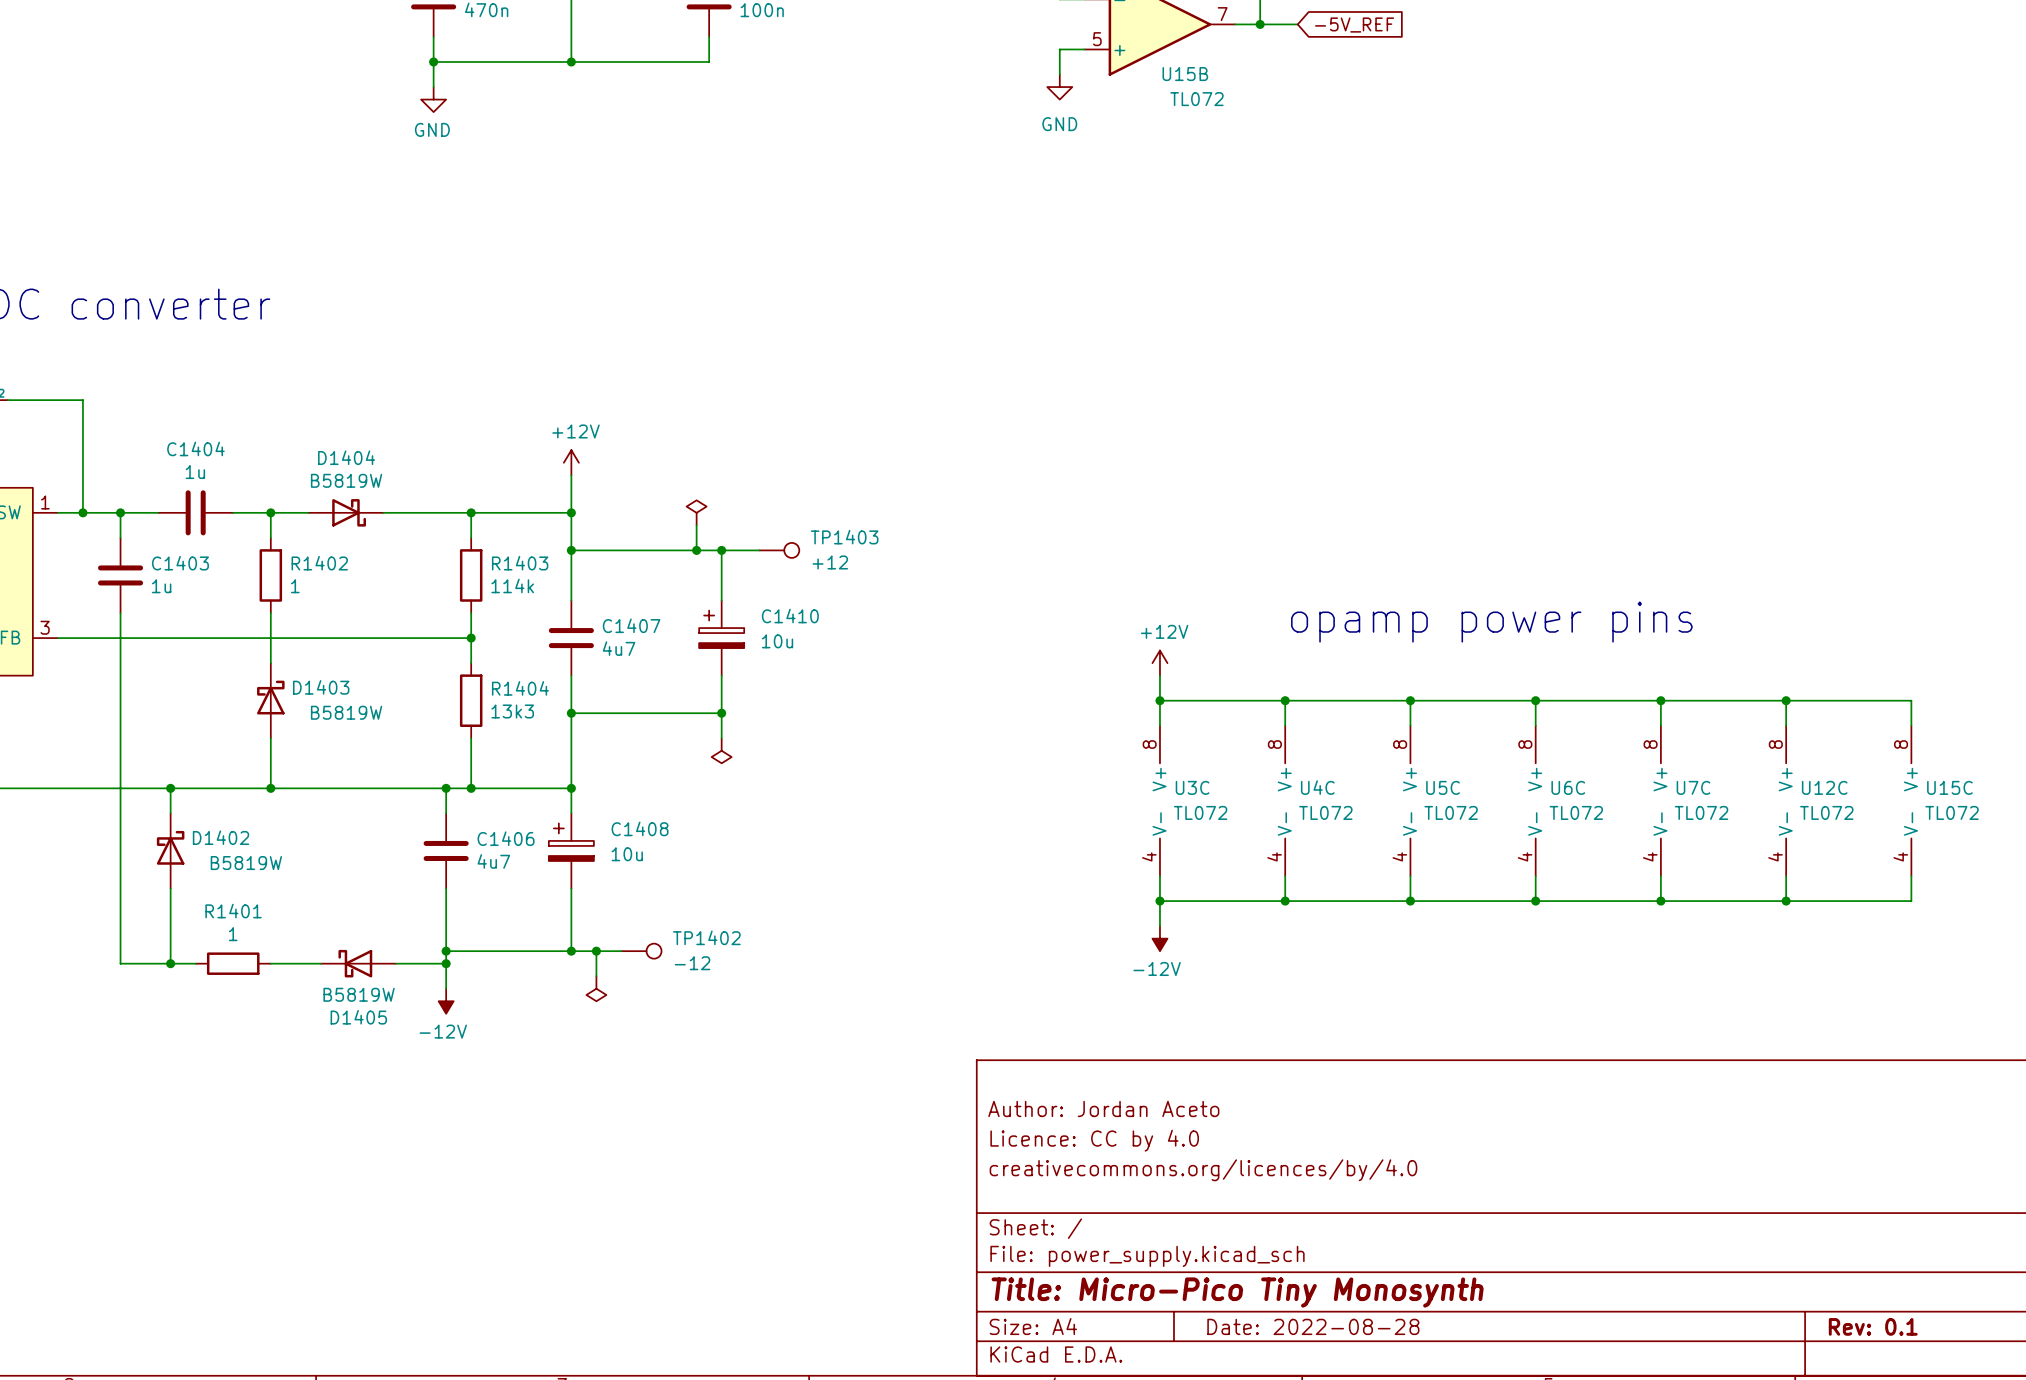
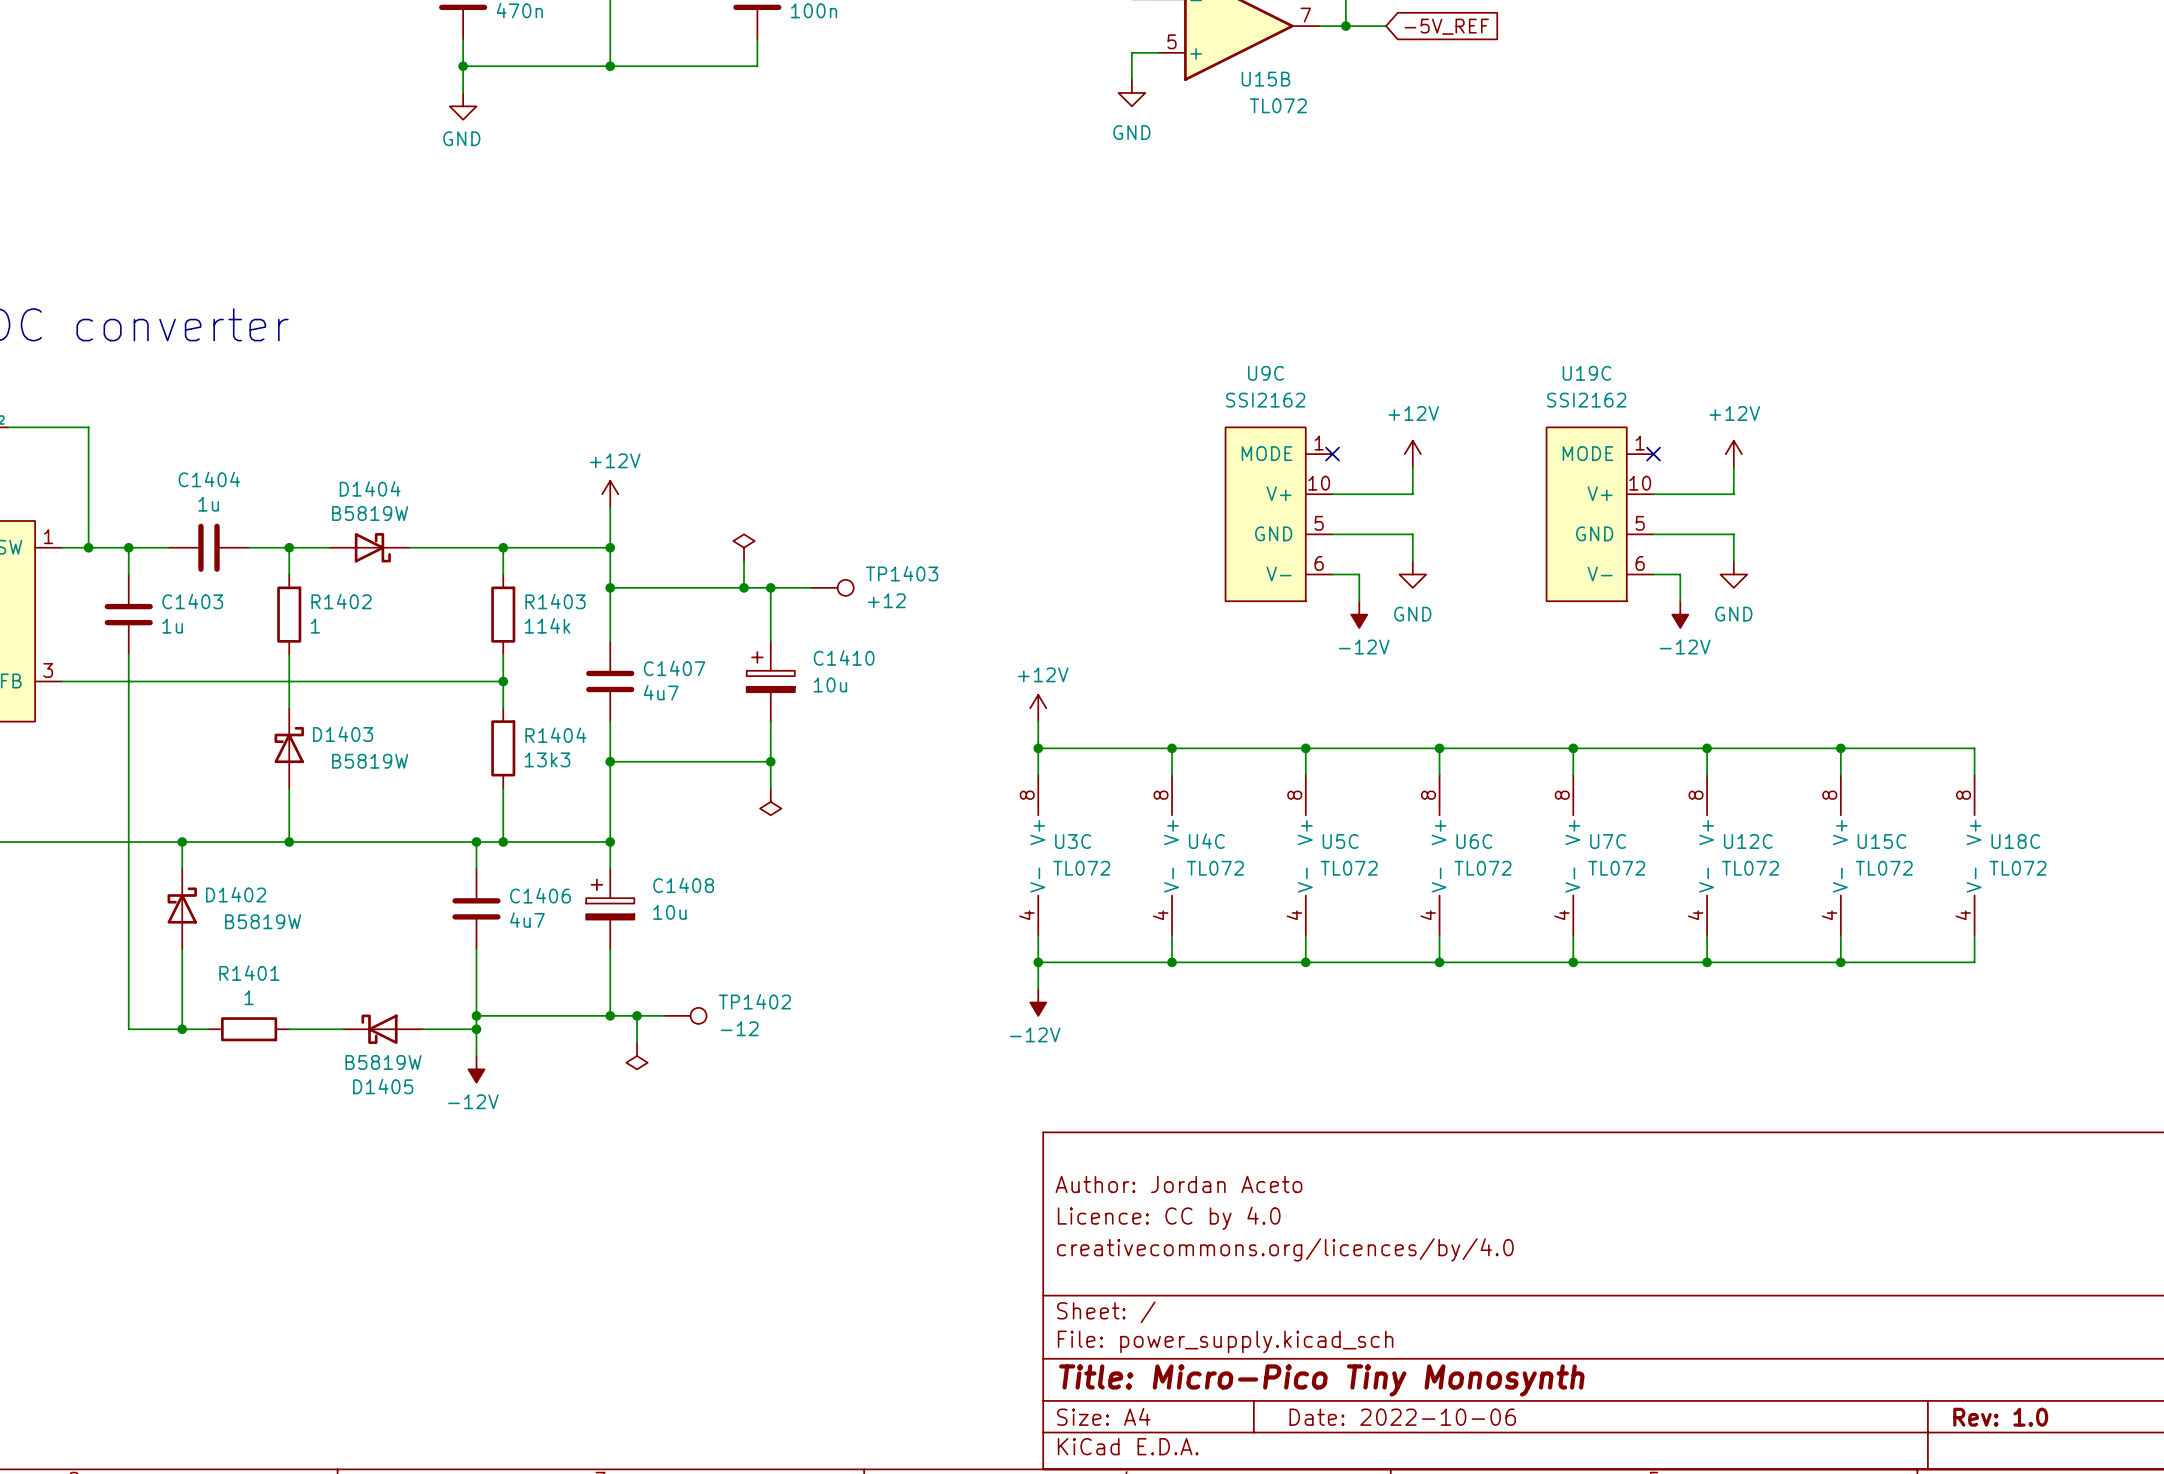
no-connect mark: none -> (1332, 454)
power symbol: none -> +12V (1412, 454)
no-connect mark: none -> (1653, 454)
power symbol: none -> +12V (1733, 454)
wire: none -> (1412, 467) (1412, 494) (1332, 494)
wire: none -> (1733, 467) (1733, 494) (1653, 494)
U9C: none -> SSI2162 (1279, 514)
U19C: none -> SSI2162 (1600, 514)
wire: none -> (1332, 534) (1412, 534) (1412, 561)
wire: none -> (1653, 534) (1733, 534) (1733, 561)
wire: none -> (1332, 574) (1359, 574) (1359, 601)
power symbol: none -> GND (1412, 574)
wire: none -> (1653, 574) (1680, 574) (1680, 601)
power symbol: none -> GND (1733, 574)
power symbol: none -> -12V (1359, 614)
power symbol: none -> -12V (1680, 614)
text: opamp power pins (1491, 622) -> none
power symbol: none -> +12V (1038, 708)
power symbol: +12V (1159, 663) -> none
wire: (1159, 675) (1159, 725) -> (1038, 721) (1038, 775)
wire: none -> (1038, 748) (1238, 748)
junction: none -> (1038, 748)
junction: none -> (1172, 748)
junction: (1159, 700) -> none
junction: none -> (1305, 748)
wire: (1285, 700) (1285, 725) -> (1172, 748) (1172, 775)
junction: (1285, 700) -> none
junction: none -> (1439, 748)
wire: (1410, 700) (1410, 725) -> (1305, 748) (1305, 775)
junction: (1410, 700) -> none
junction: none -> (1573, 748)
wire: (1535, 700) (1535, 725) -> (1439, 748) (1439, 775)
junction: (1535, 700) -> none
junction: none -> (1707, 748)
wire: (1660, 700) (1660, 725) -> (1573, 748) (1573, 775)
junction: (1660, 700) -> none
wire: none -> (1840, 748) (1840, 775)
junction: none -> (1840, 748)
wire: (1786, 700) (1786, 725) -> (1707, 748) (1707, 775)
junction: (1786, 700) -> none
wire: (1848, 700) (1911, 700) (1911, 725) -> (1974, 748) (1974, 775)
U3C position: (1159, 800) -> (1038, 855)
U4C position: (1285, 800) -> (1172, 855)
U5C position: (1410, 800) -> (1305, 855)
U6C position: (1535, 800) -> (1439, 855)
U7C position: (1660, 800) -> (1573, 855)
U12C position: (1786, 800) -> (1707, 855)
U18C: none -> TL072 (1974, 855)
U15C position: (1911, 800) -> (1840, 855)
wire: (1159, 876) (1159, 926) -> (1038, 935) (1038, 989)
wire: (1285, 876) (1285, 901) -> (1172, 935) (1172, 962)
wire: (1410, 876) (1410, 901) -> (1305, 935) (1305, 962)
wire: (1535, 876) (1535, 901) -> (1439, 935) (1439, 962)
wire: (1660, 876) (1660, 901) -> (1573, 935) (1573, 962)
wire: none -> (1840, 935) (1840, 962)
wire: (1786, 876) (1786, 901) -> (1707, 935) (1707, 962)
wire: (1911, 876) (1911, 901) (1848, 901) -> (1974, 935) (1974, 962)
wire: none -> (1038, 962) (1238, 962)
junction: none -> (1038, 962)
junction: none -> (1172, 962)
junction: (1159, 901) -> none
junction: none -> (1305, 962)
junction: (1285, 901) -> none
junction: none -> (1439, 962)
junction: (1410, 901) -> none
junction: none -> (1573, 962)
junction: (1535, 901) -> none
junction: none -> (1707, 962)
junction: (1660, 901) -> none
junction: none -> (1840, 962)
junction: (1786, 901) -> none
power symbol position: -12V (1159, 938) -> -12V (1038, 1002)
title block: Date: 2022-08-28 (1313, 1326) -> Date: 2022-10-06 (1402, 1417)
title block: Rev: 0.1 (1873, 1326) -> Rev: 1.0 (2000, 1417)

